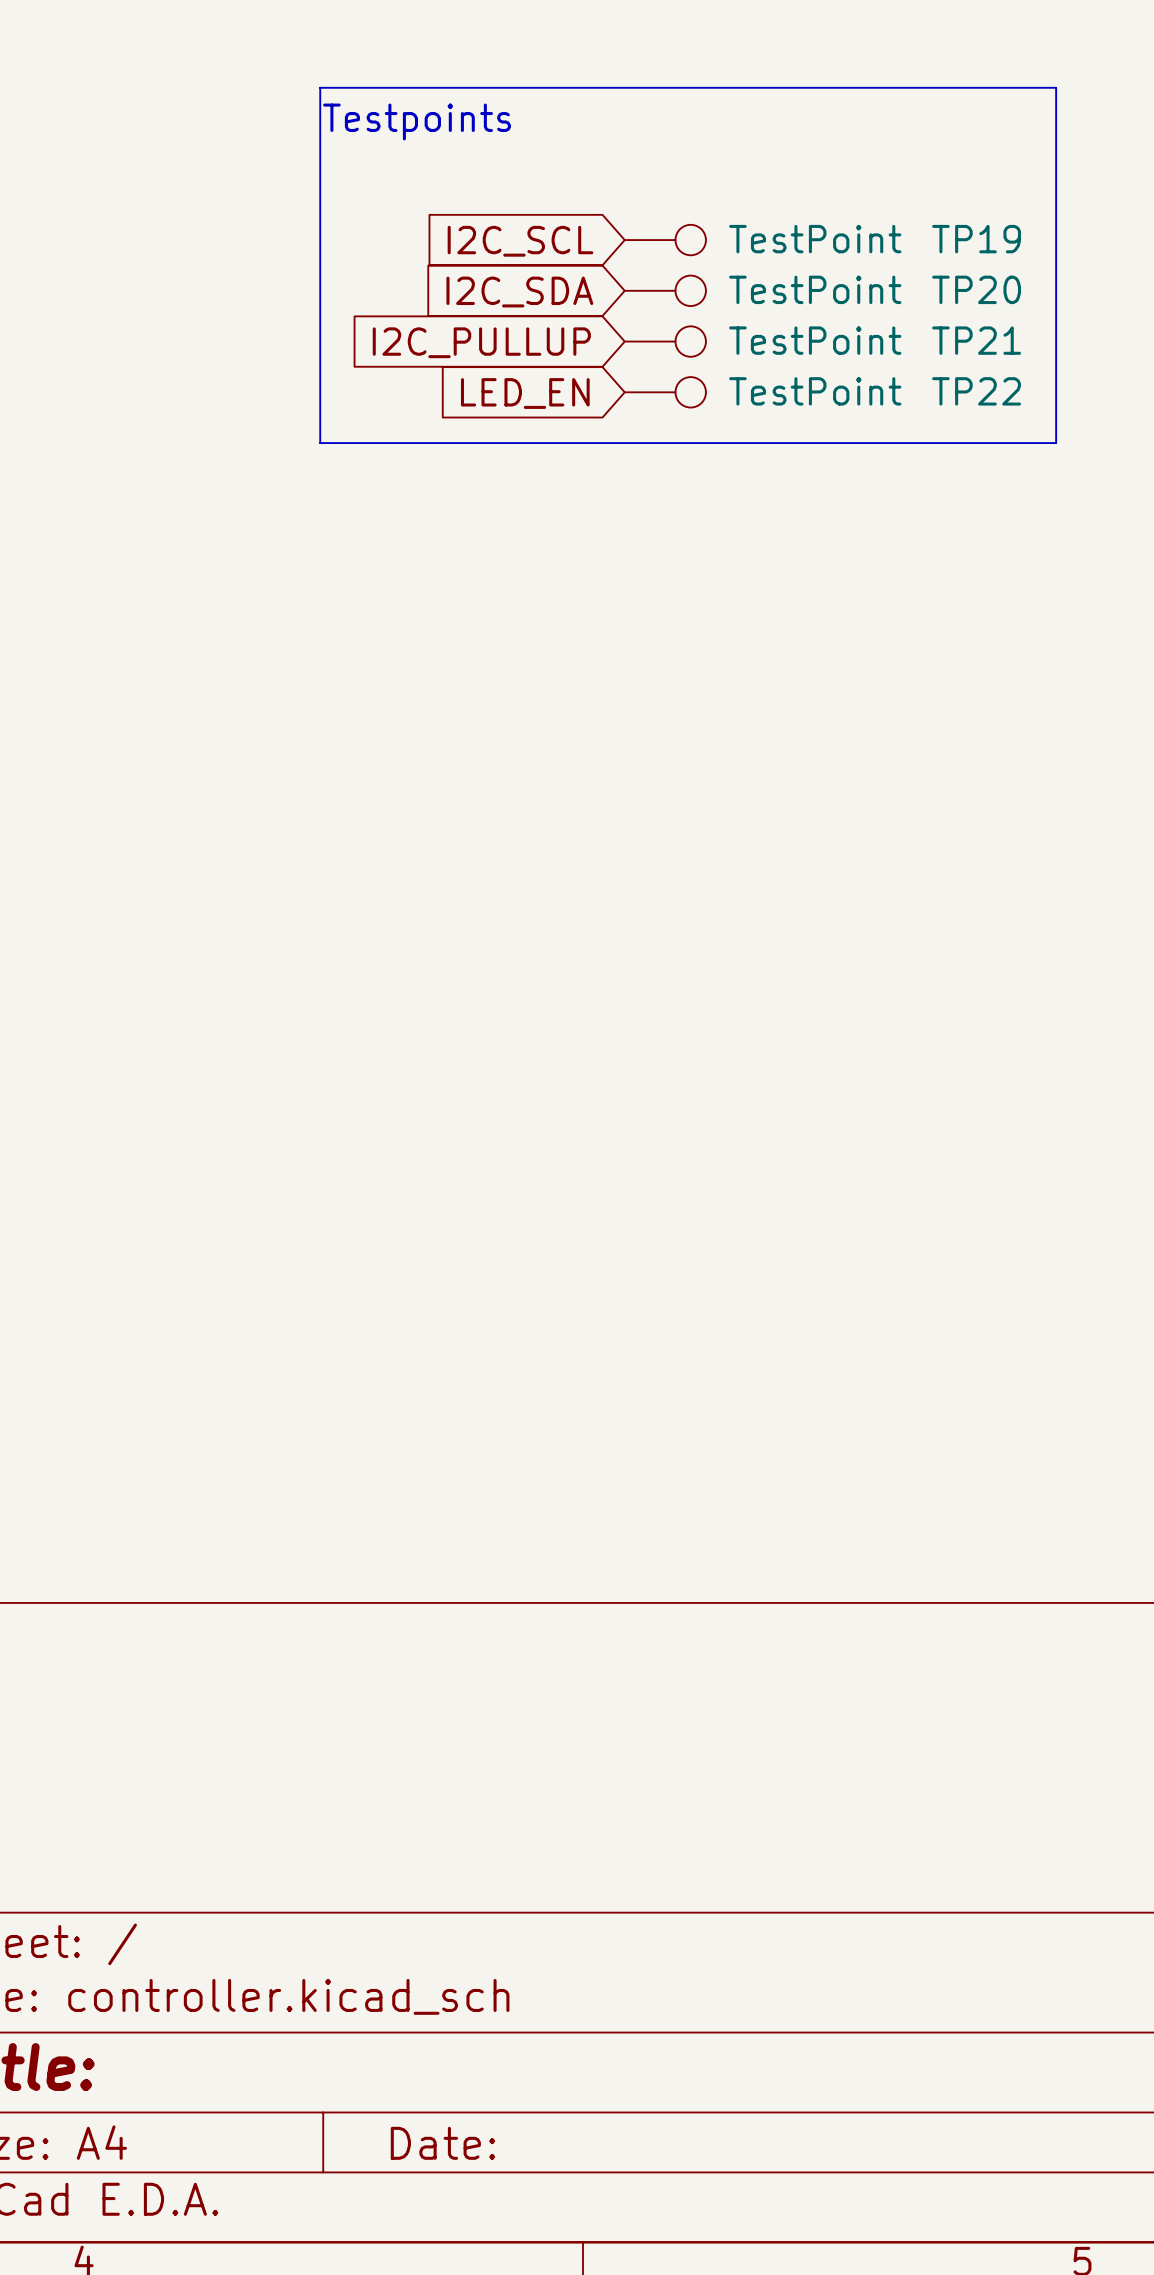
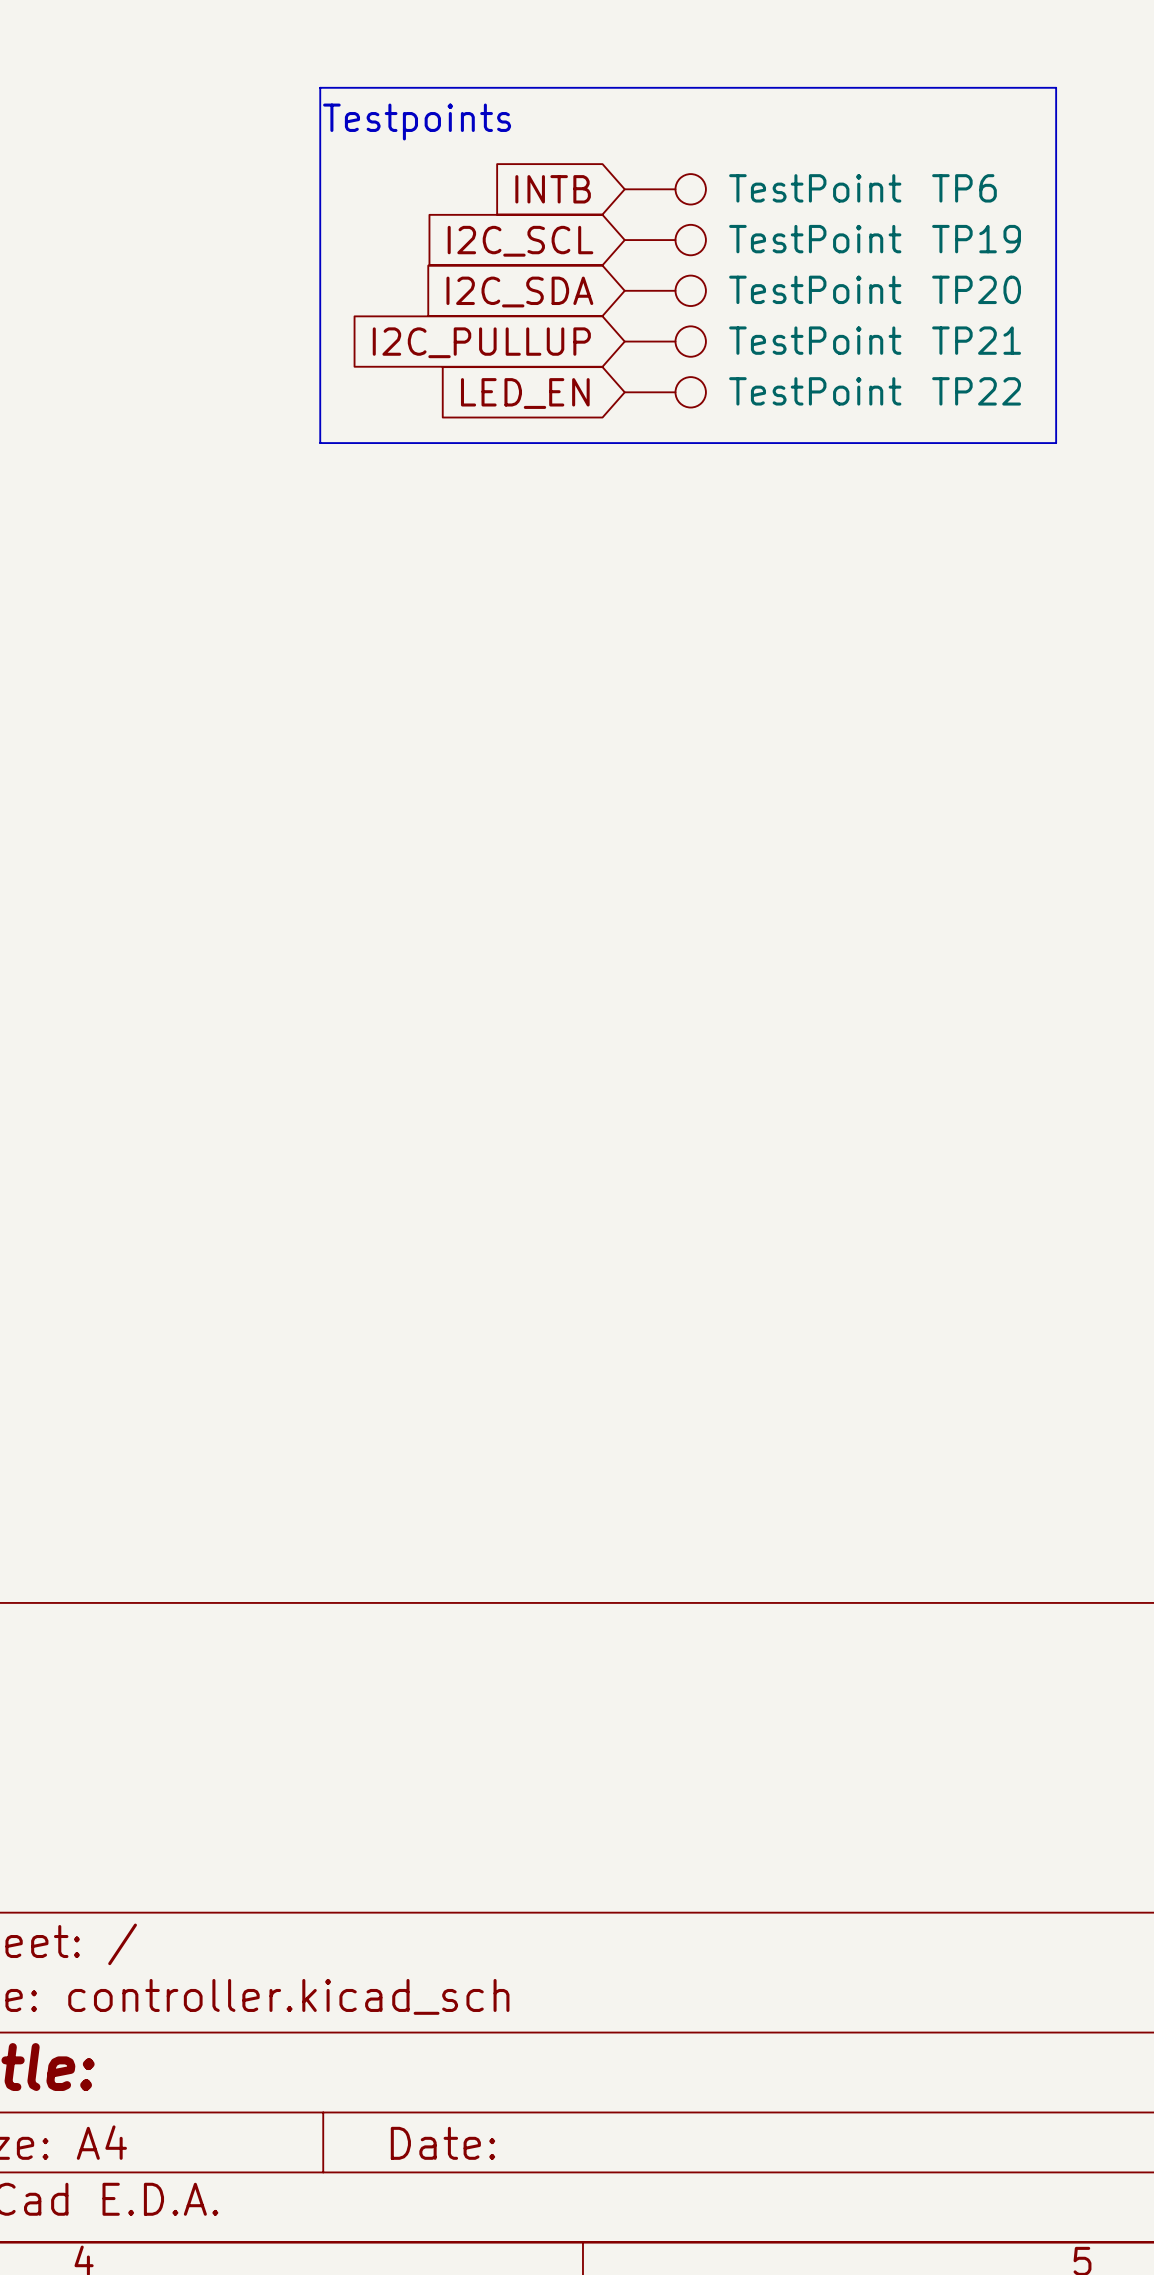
global label: none -> INTB (553, 189)
TP6: none -> TestPoint (665, 189)

